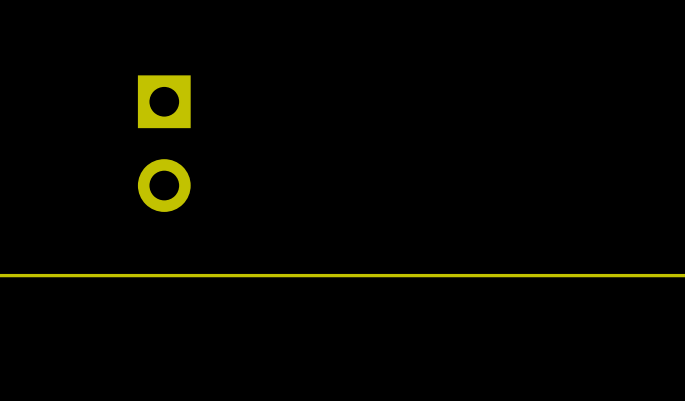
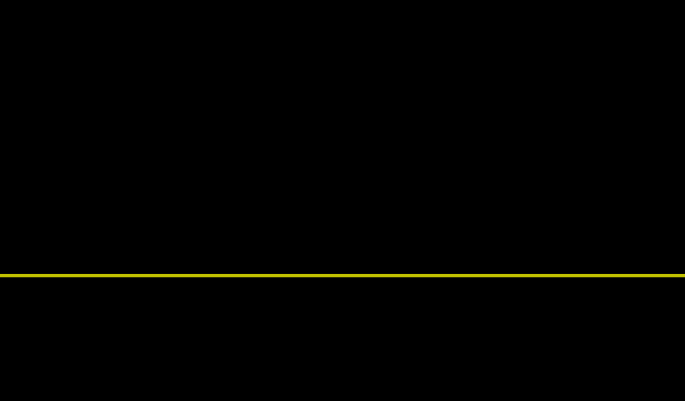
part: (164, 143) -> none

